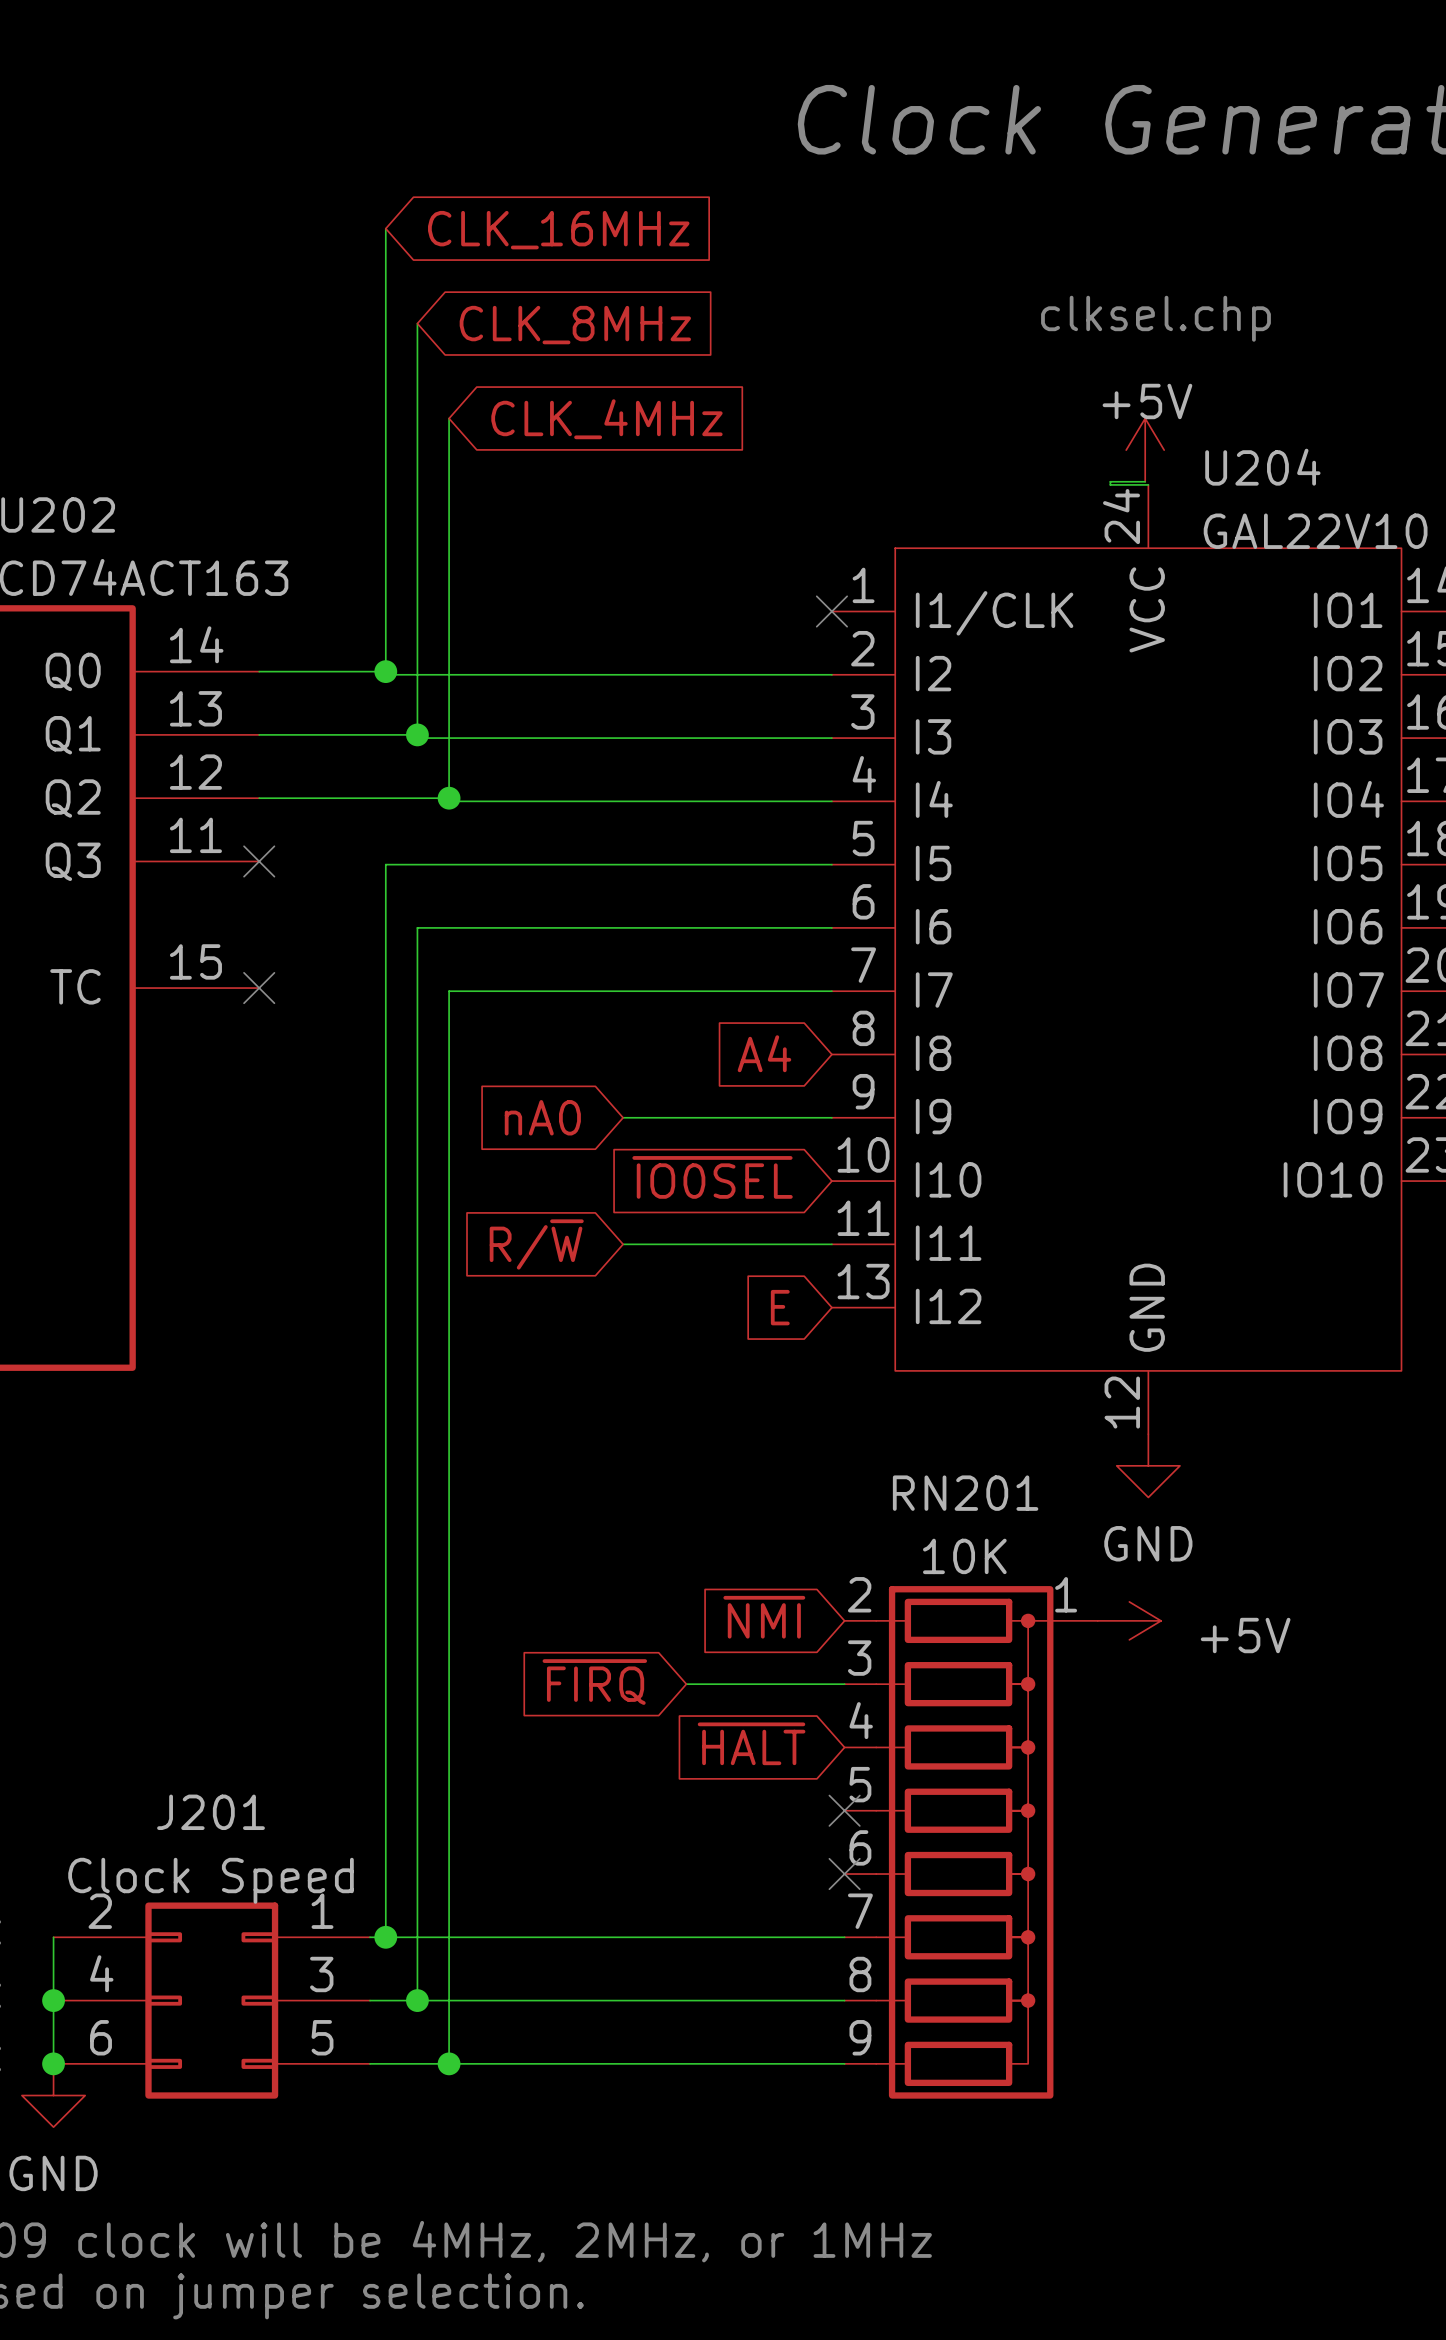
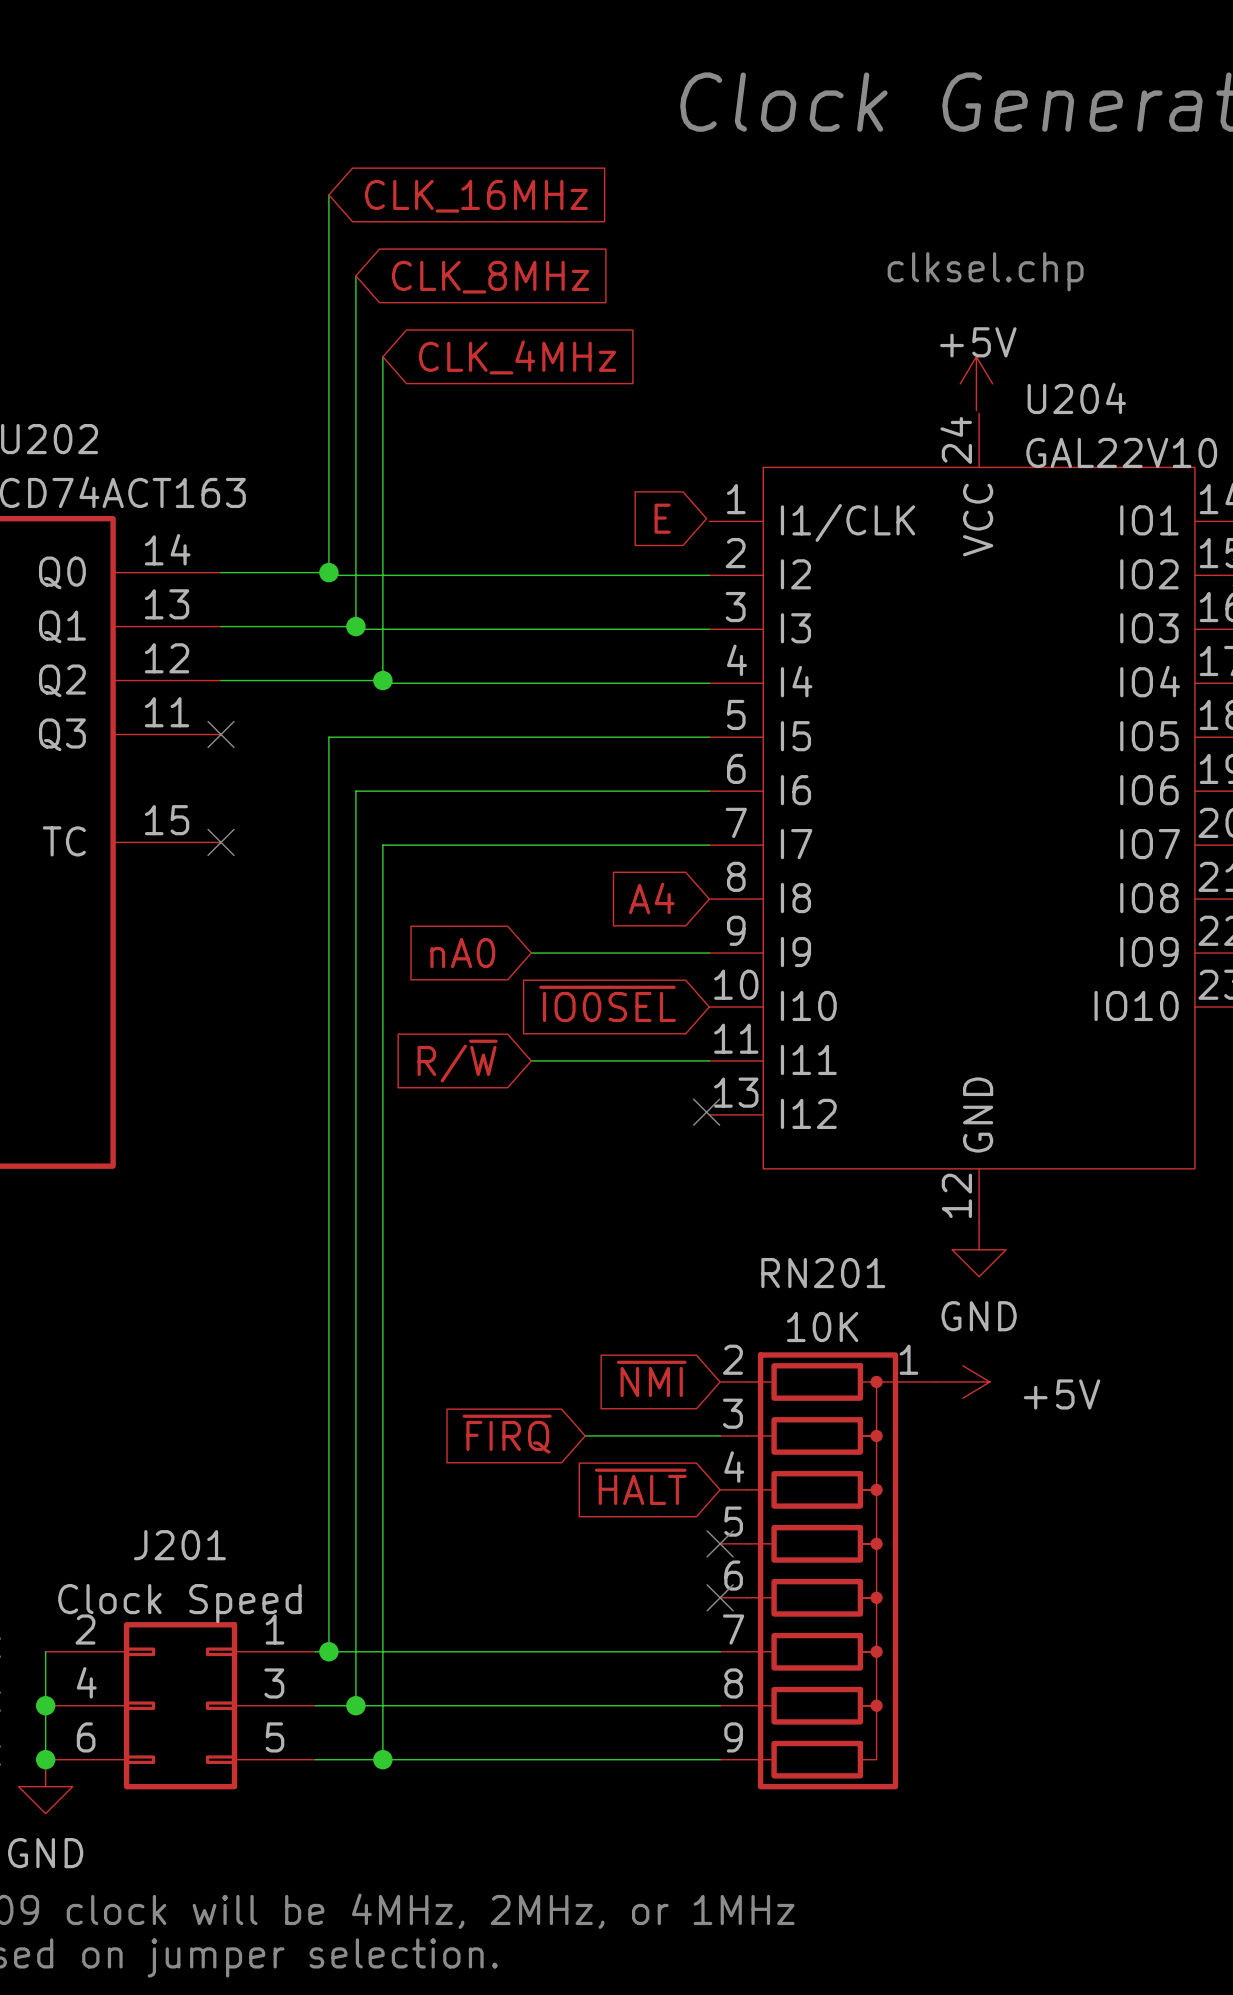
wire: (1145, 481) (1110, 481) (1110, 484) (1148, 484) -> none
global label: none -> E (662, 518)
no-connect mark: (831, 611) -> none
no-connect mark: none -> (706, 1112)
global label: E (780, 1307) -> none

